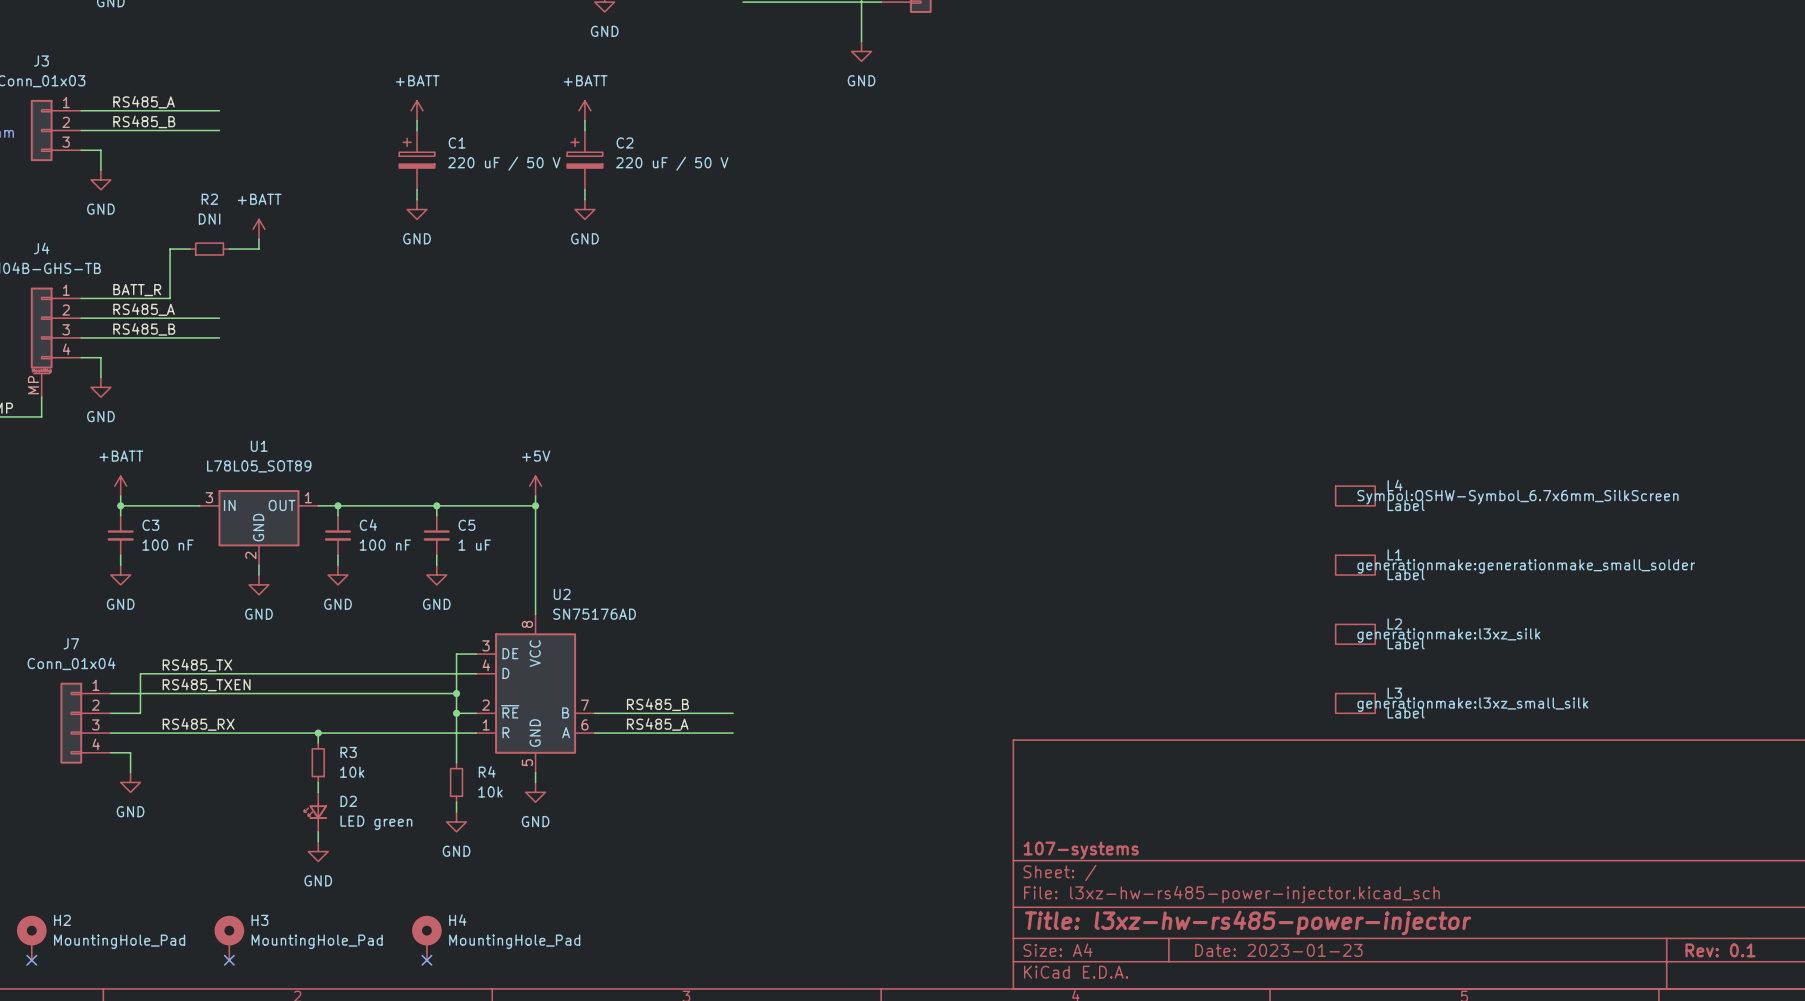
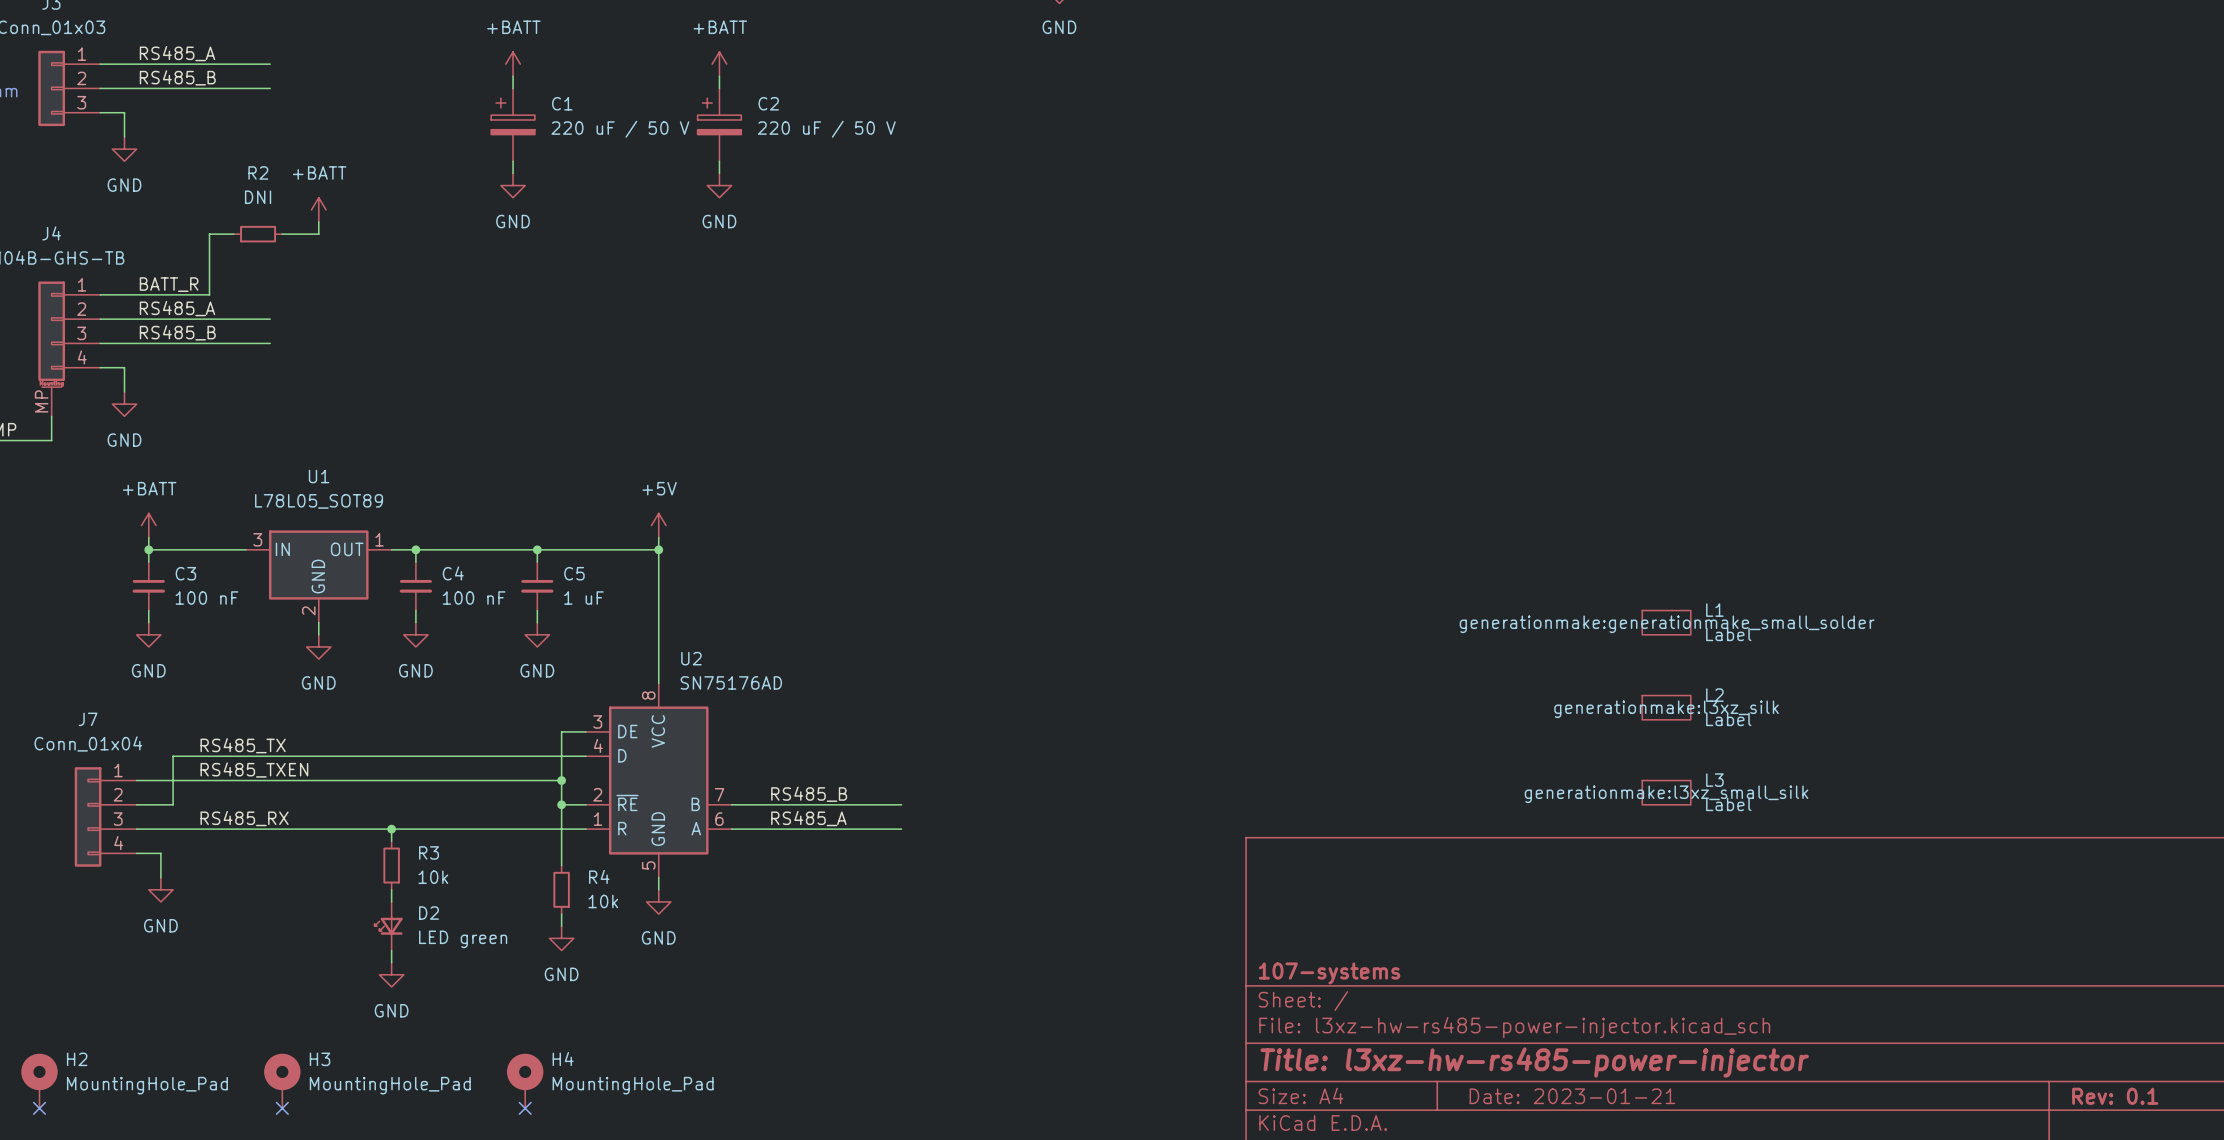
L4: Label (1355, 495) -> none
L1 text position: generationmake:generationmake_small_solder (1526, 566) -> generationmake:generationmake_small_solder (1667, 624)
L2 text position: generationmake:l3xz_silk (1448, 635) -> generationmake:l3xz_silk (1666, 709)
L3 text position: generationmake:l3xz_small_silk (1472, 704) -> generationmake:l3xz_small_silk (1666, 794)
title block: Date: 2023-01-23 (1278, 950) -> Date: 2023-01-21 (1572, 1096)

